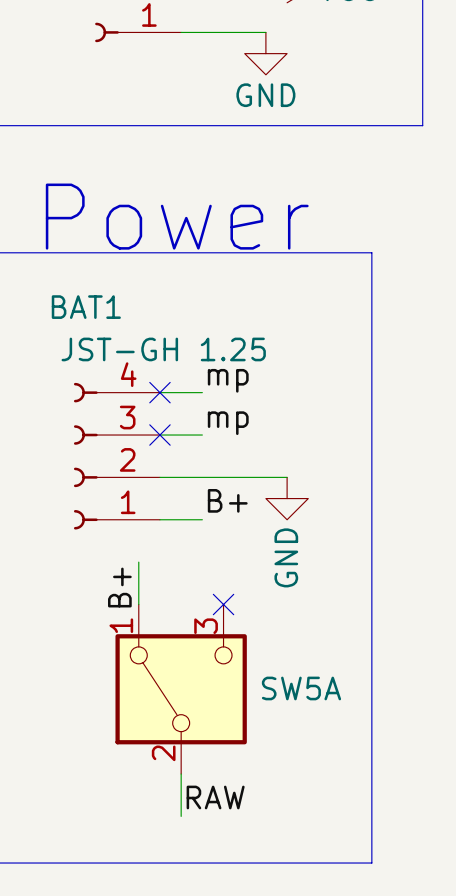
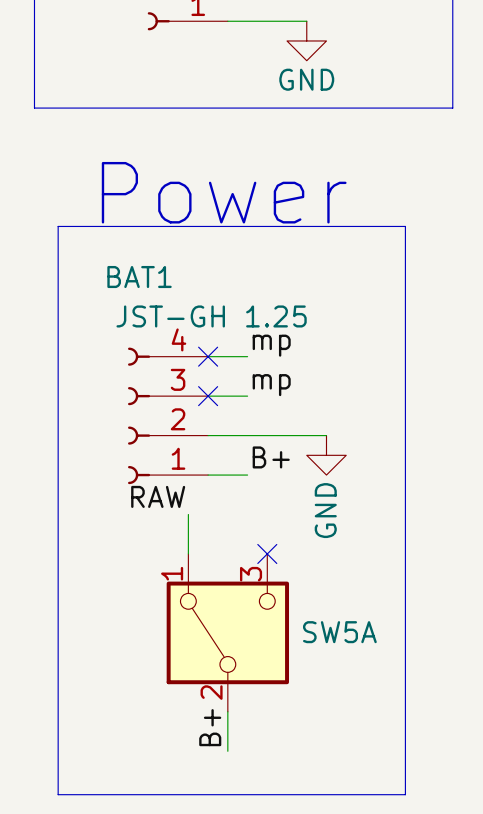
label position: B+ (119, 587) -> B+ (210, 727)
label position: RAW (215, 797) -> RAW (158, 496)

